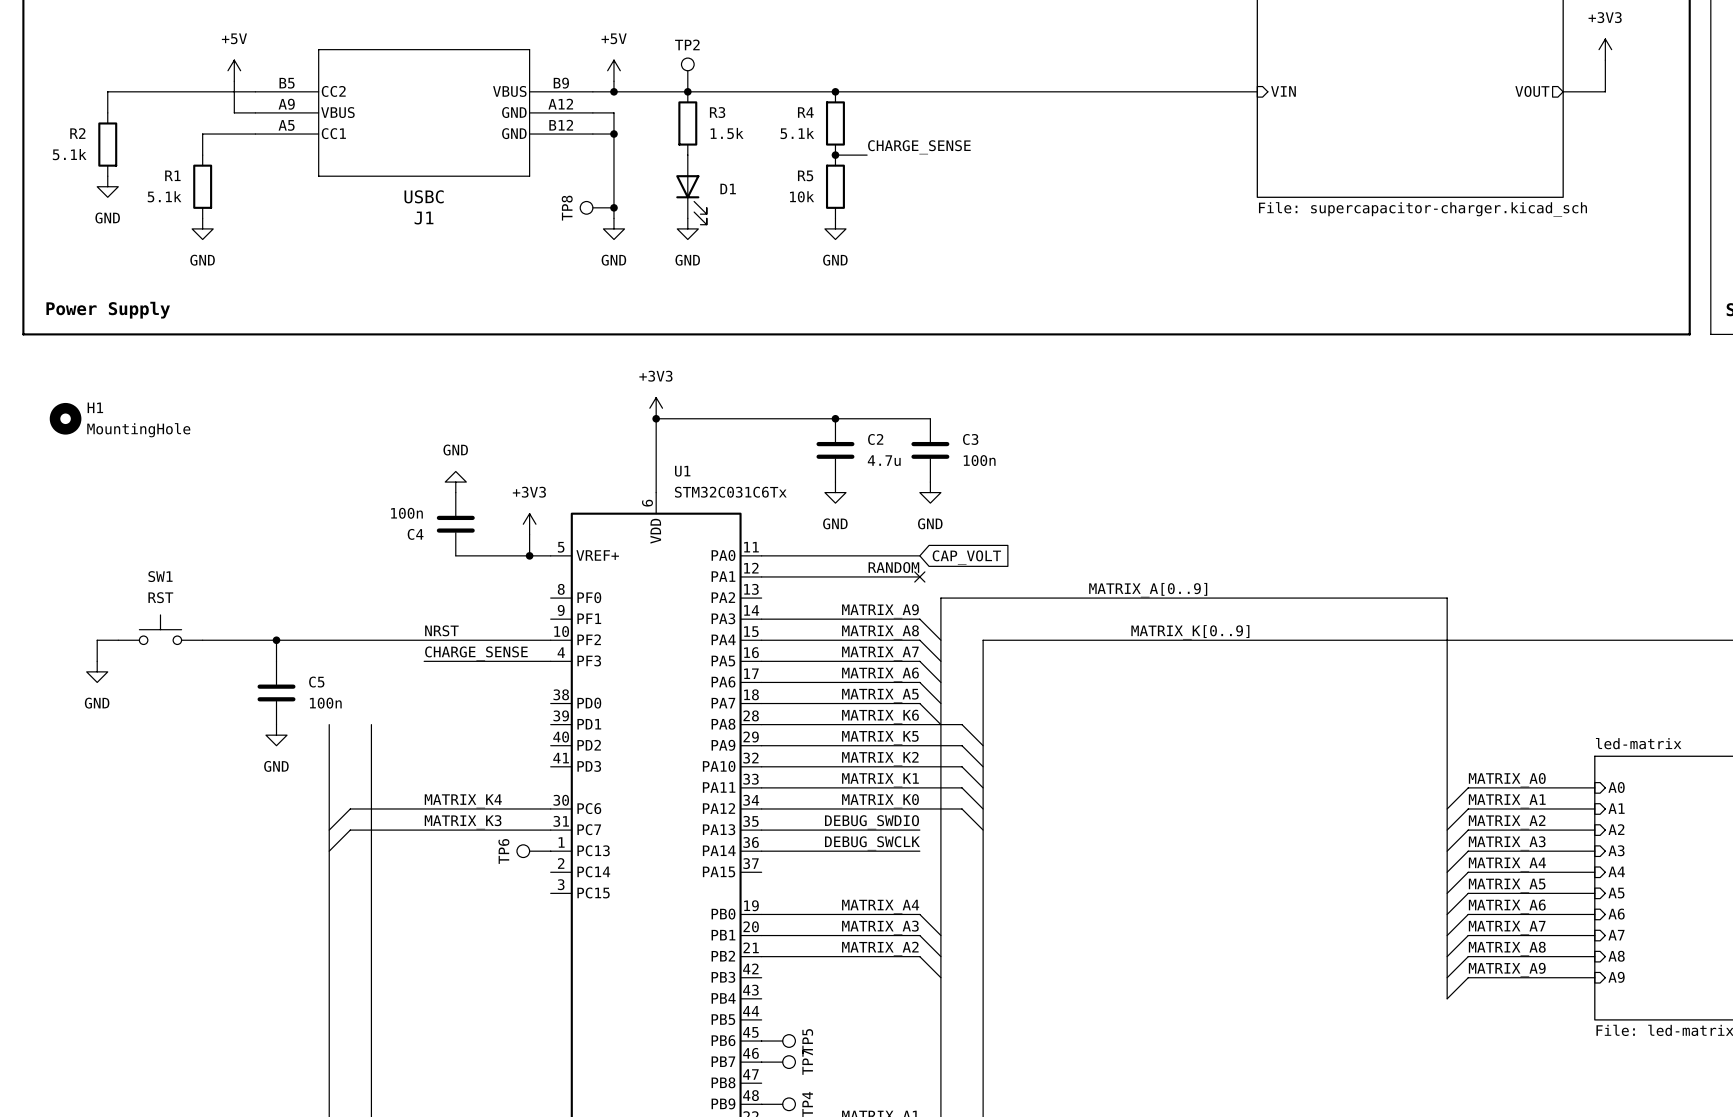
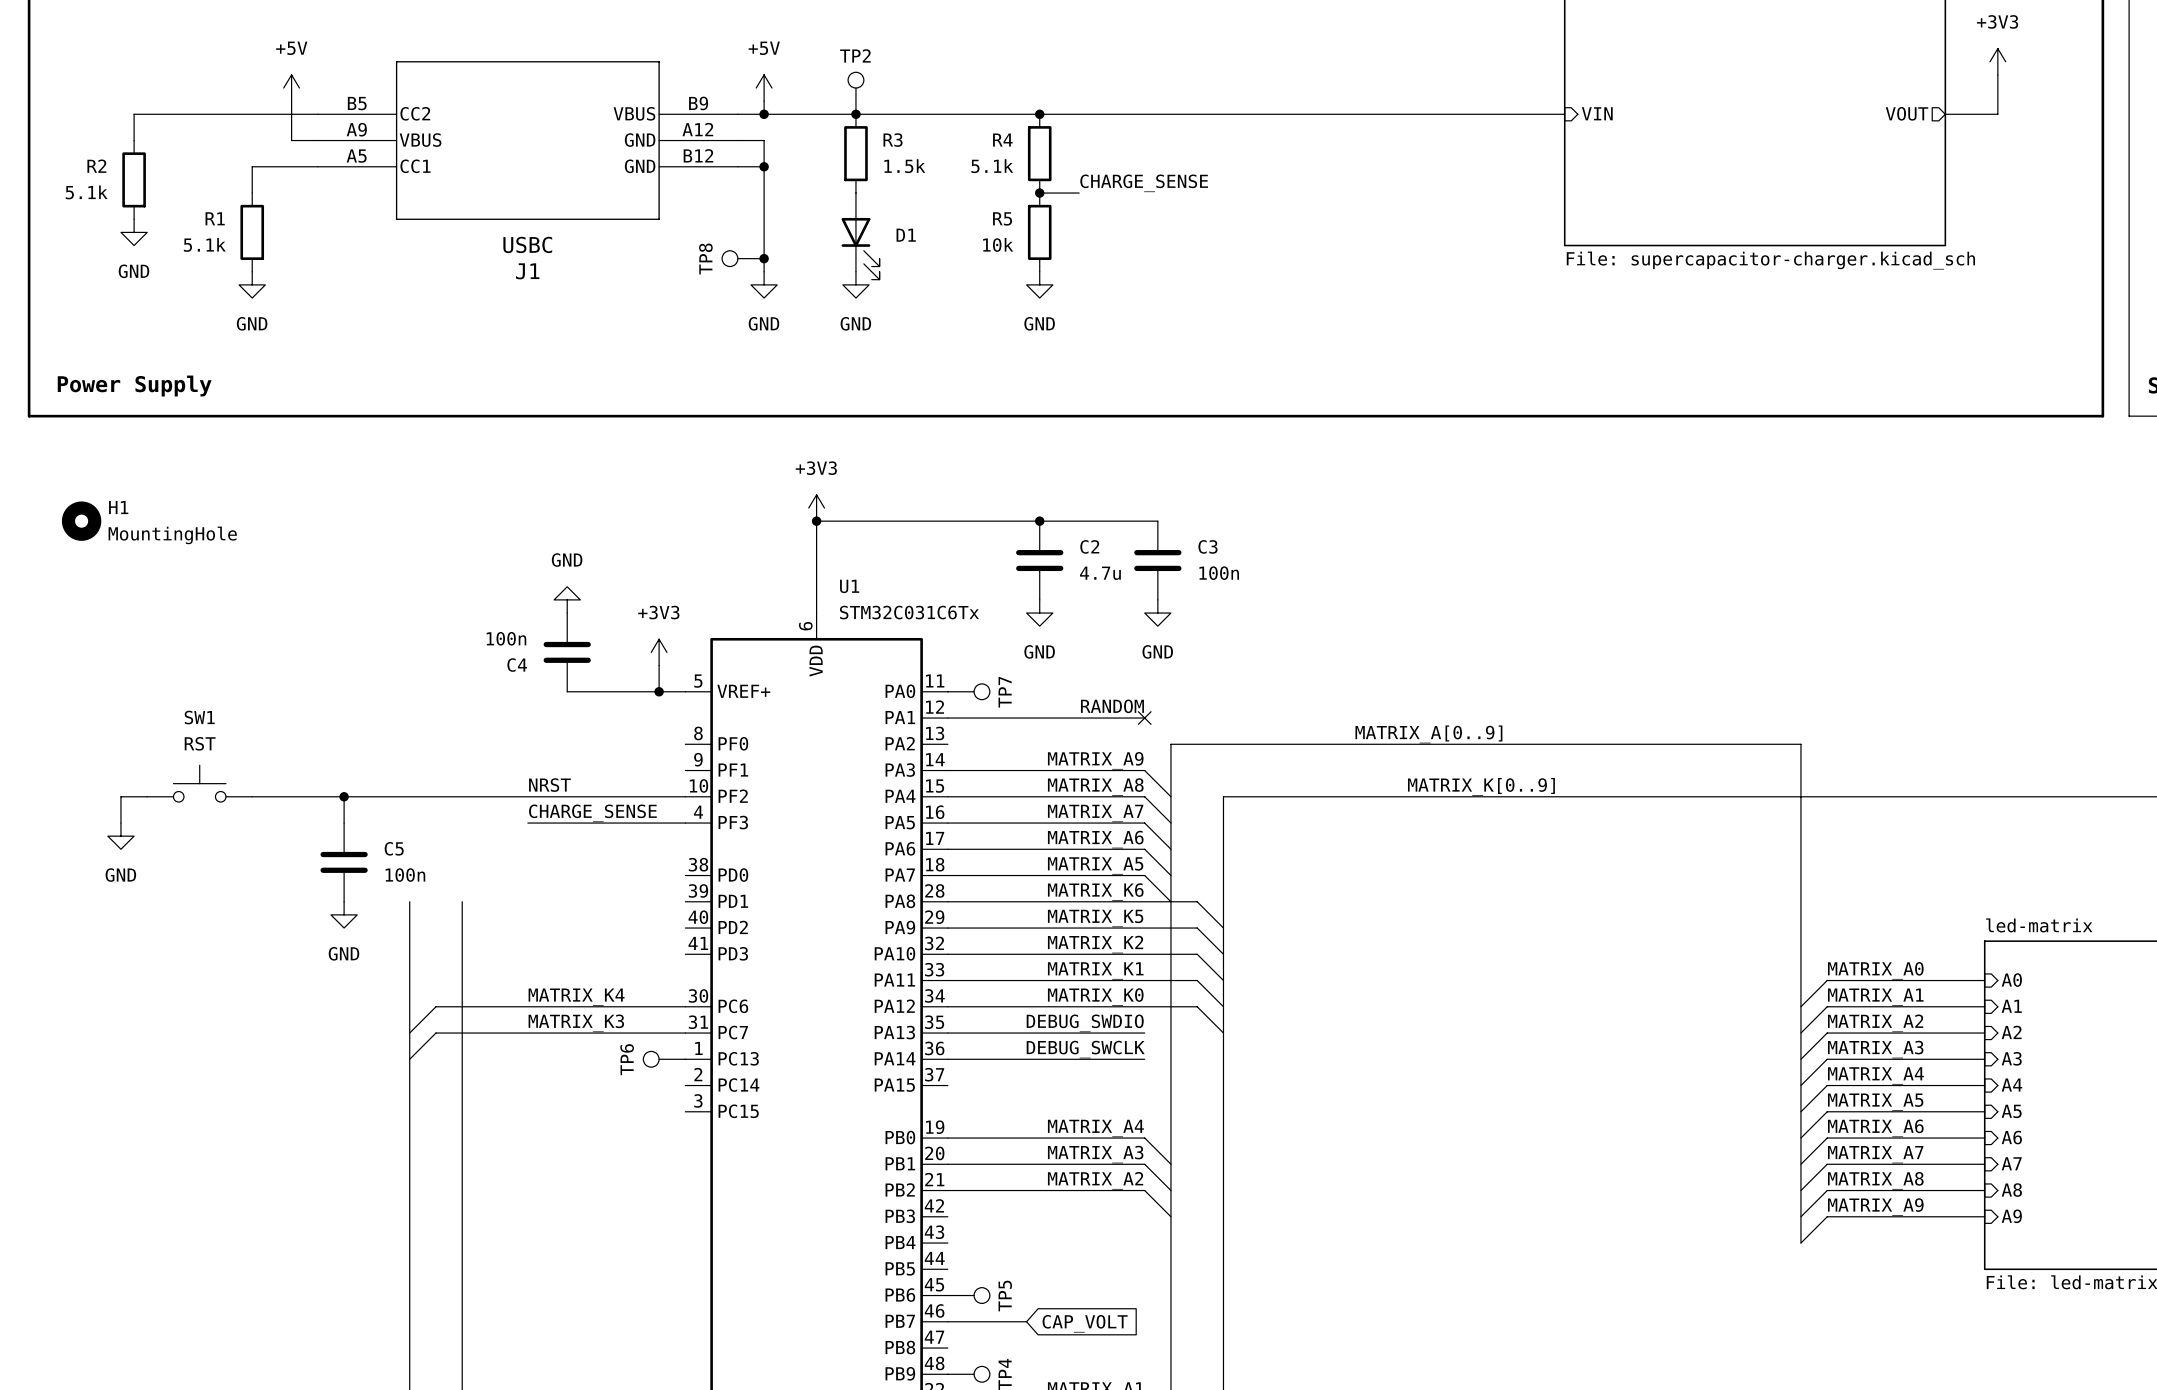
wire: (761, 555) (919, 555) -> none
global label: CAP_VOLT (966, 557) -> none
wire: none -> (947, 1321) (1026, 1321)
TP7 position: (778, 1062) -> (968, 691)
global label: none -> CAP_VOLT (1085, 1323)

